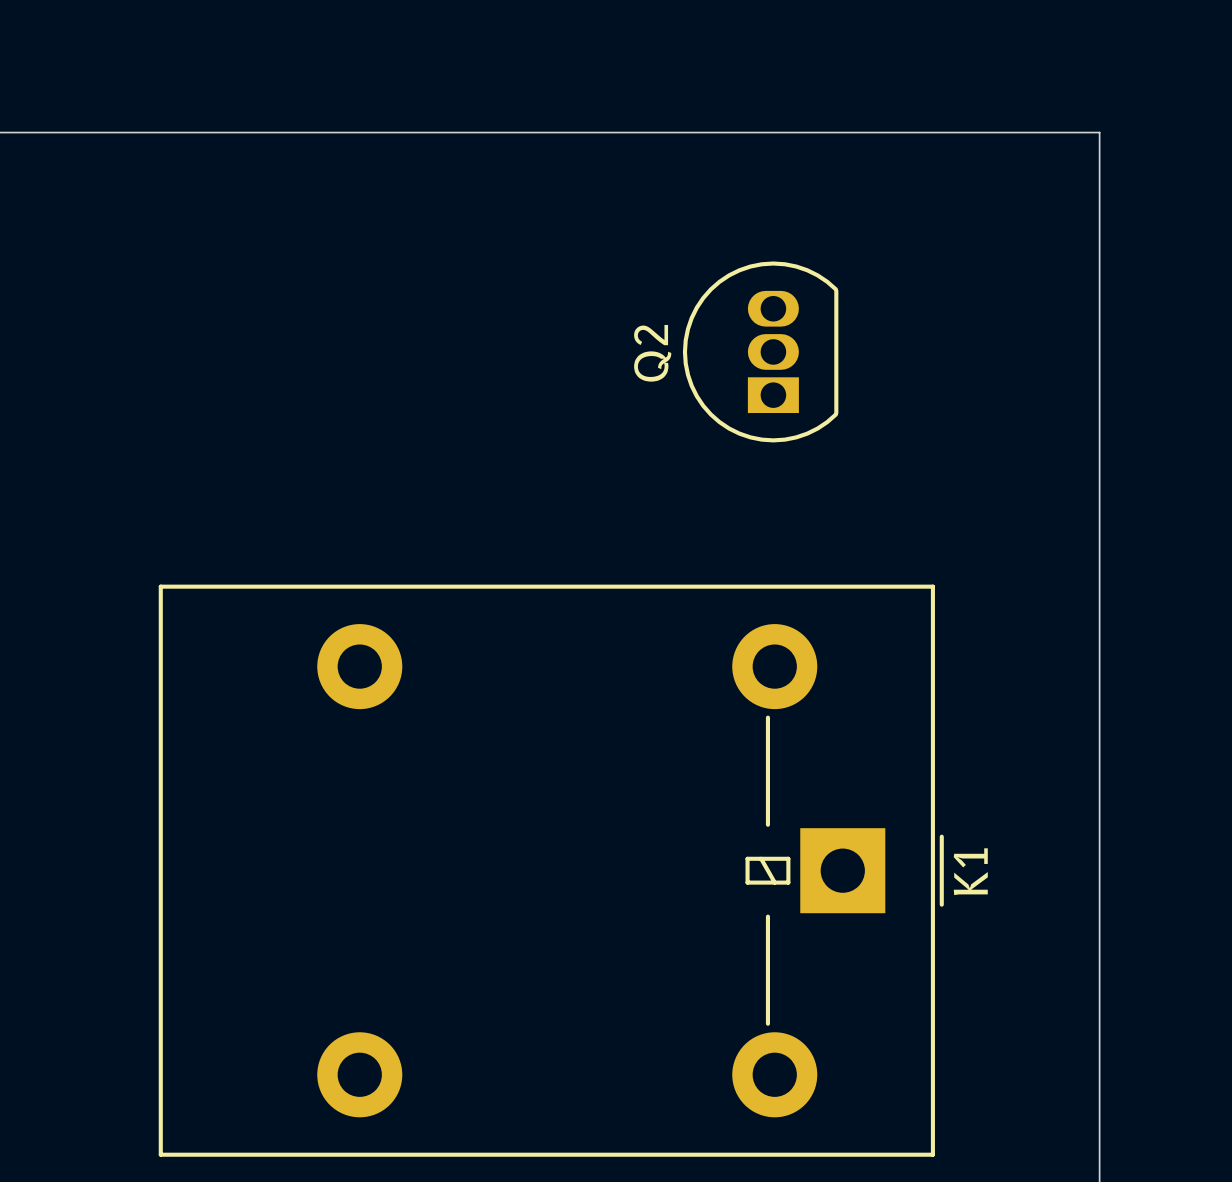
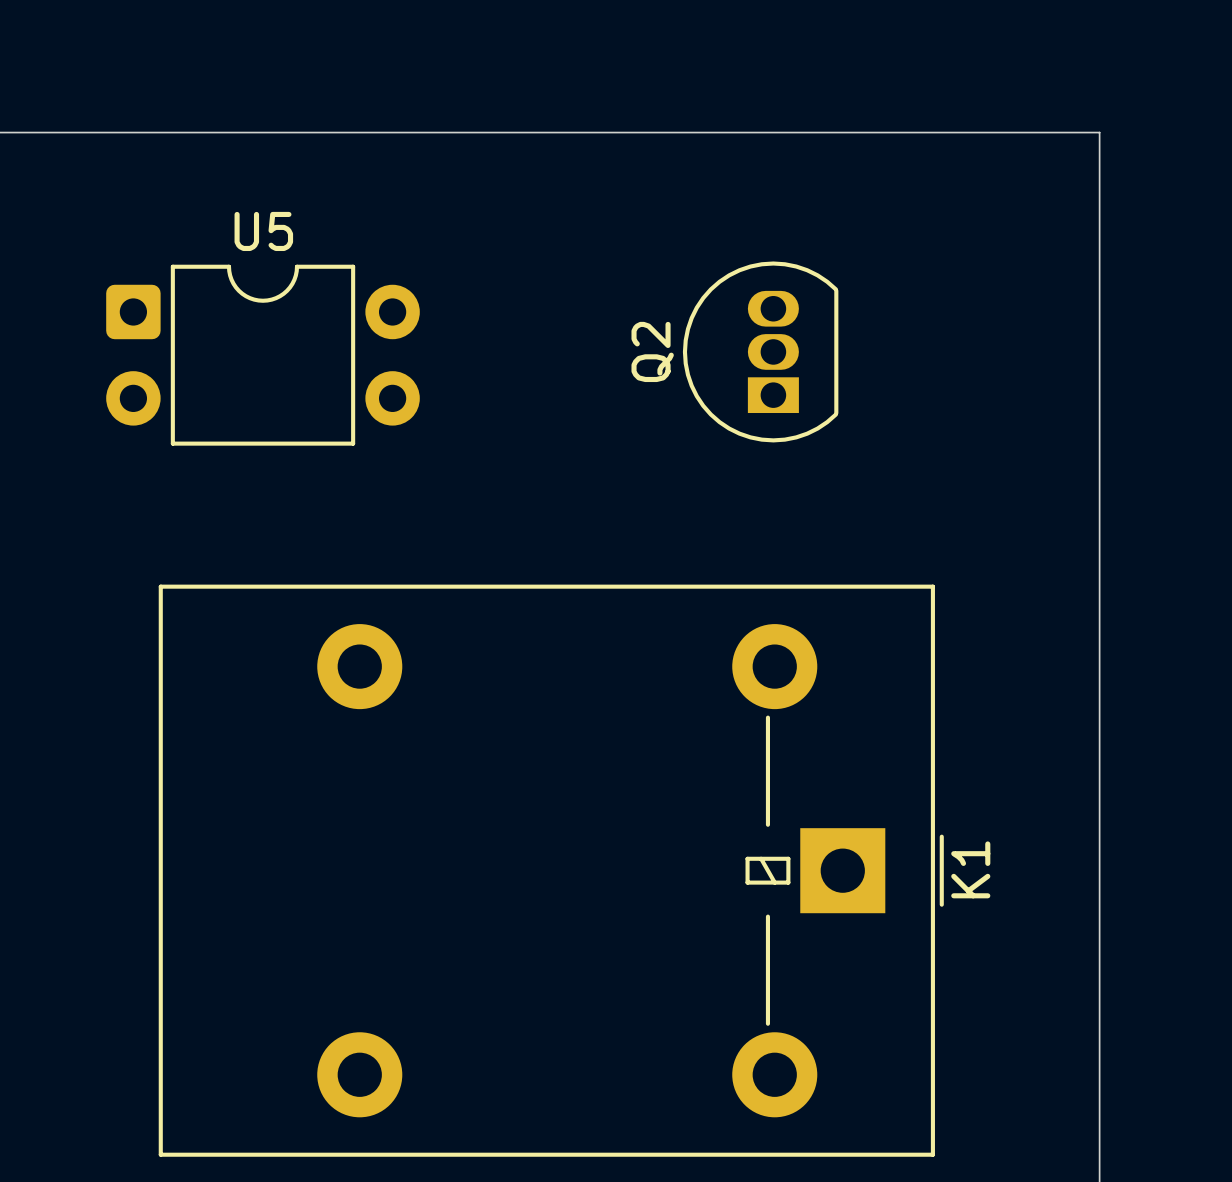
U5: none -> (262, 355)

